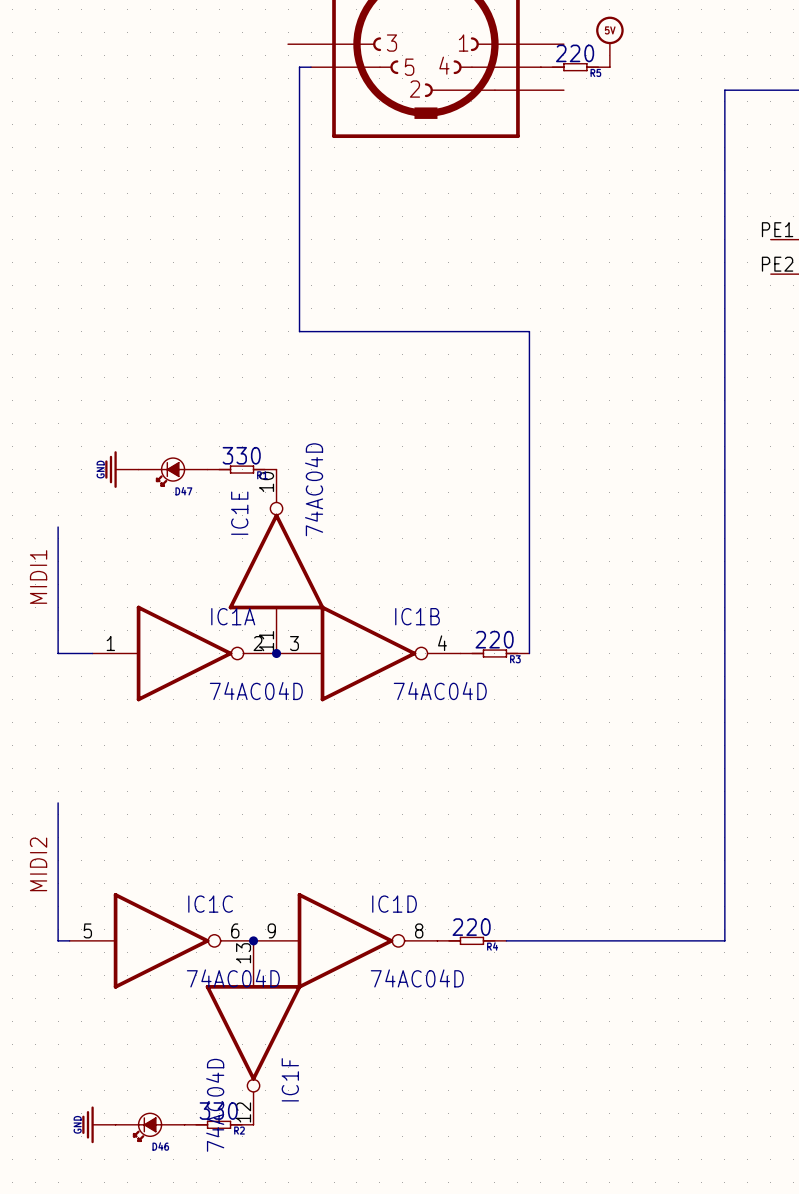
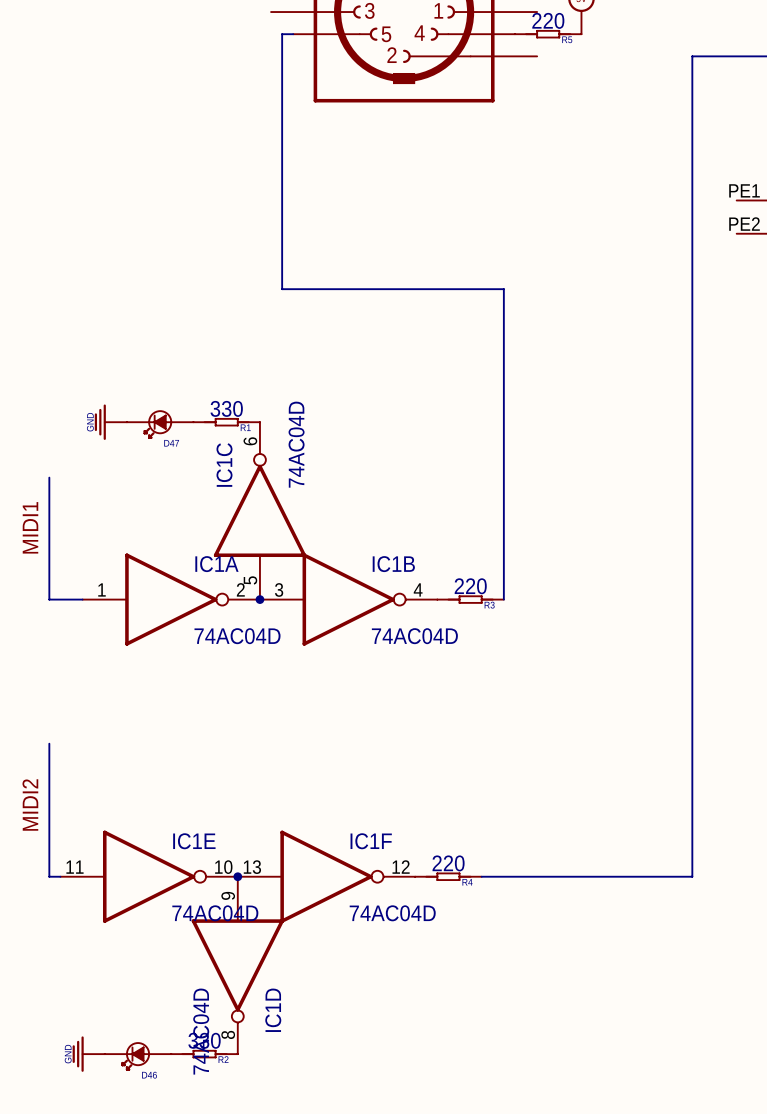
IC1E rotation: 0° (276, 561) -> 90° clockwise (149, 876)
IC1E position: (276, 561) -> (149, 876)
IC1C rotation: 0° (161, 940) -> 90° counterclockwise (259, 510)
IC1C position: (161, 940) -> (259, 510)
IC1D rotation: 0° (345, 940) -> 90° clockwise (237, 965)
IC1D position: (345, 940) -> (237, 965)
IC1F rotation: 0° (253, 1032) -> 90° counterclockwise (326, 876)
IC1F position: (253, 1032) -> (326, 876)

